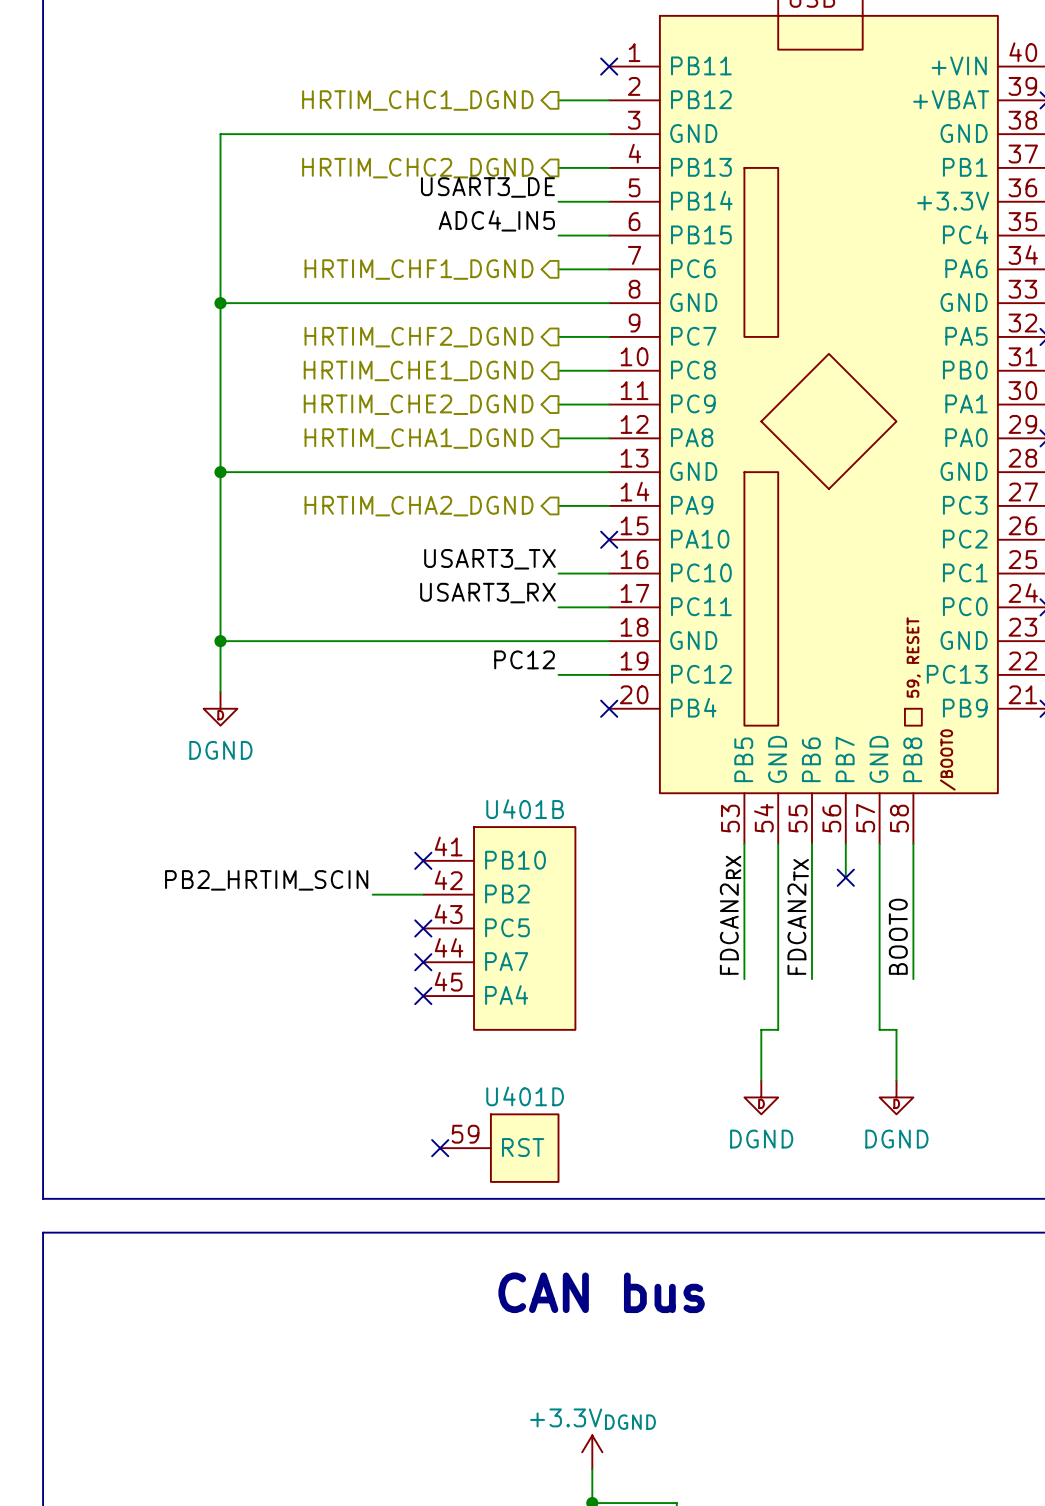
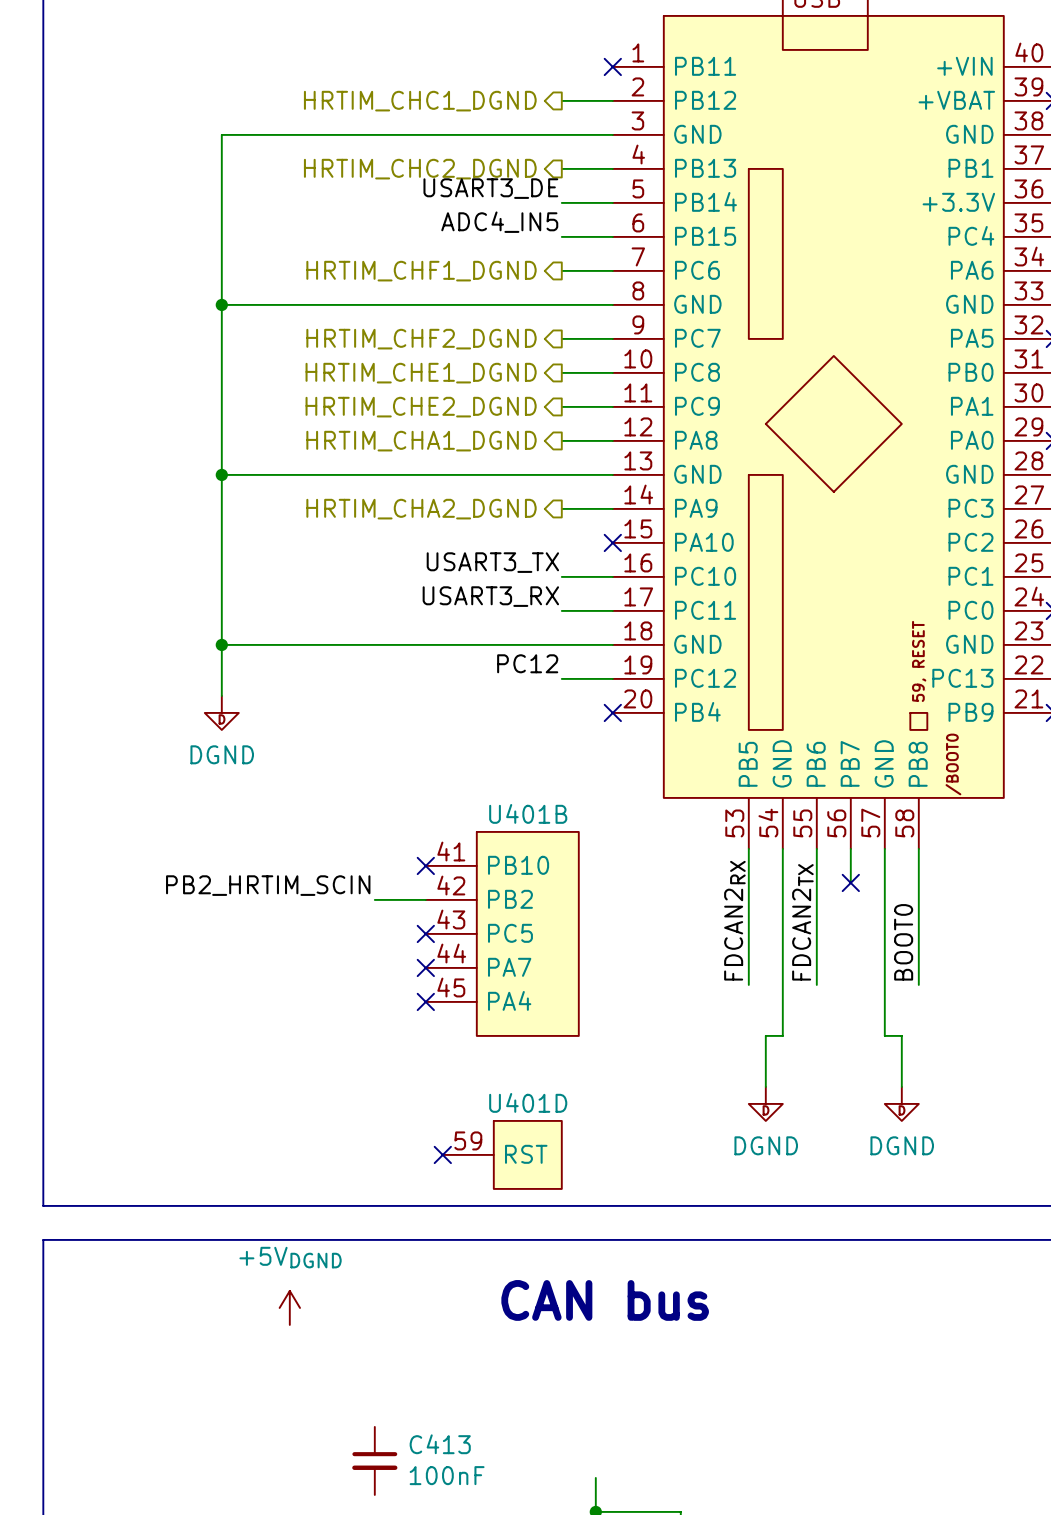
power symbol: none -> +5VDGND (289, 1307)
C413: none -> 100nF (374, 1460)
power symbol: +3.3VDGND (592, 1452) -> none

